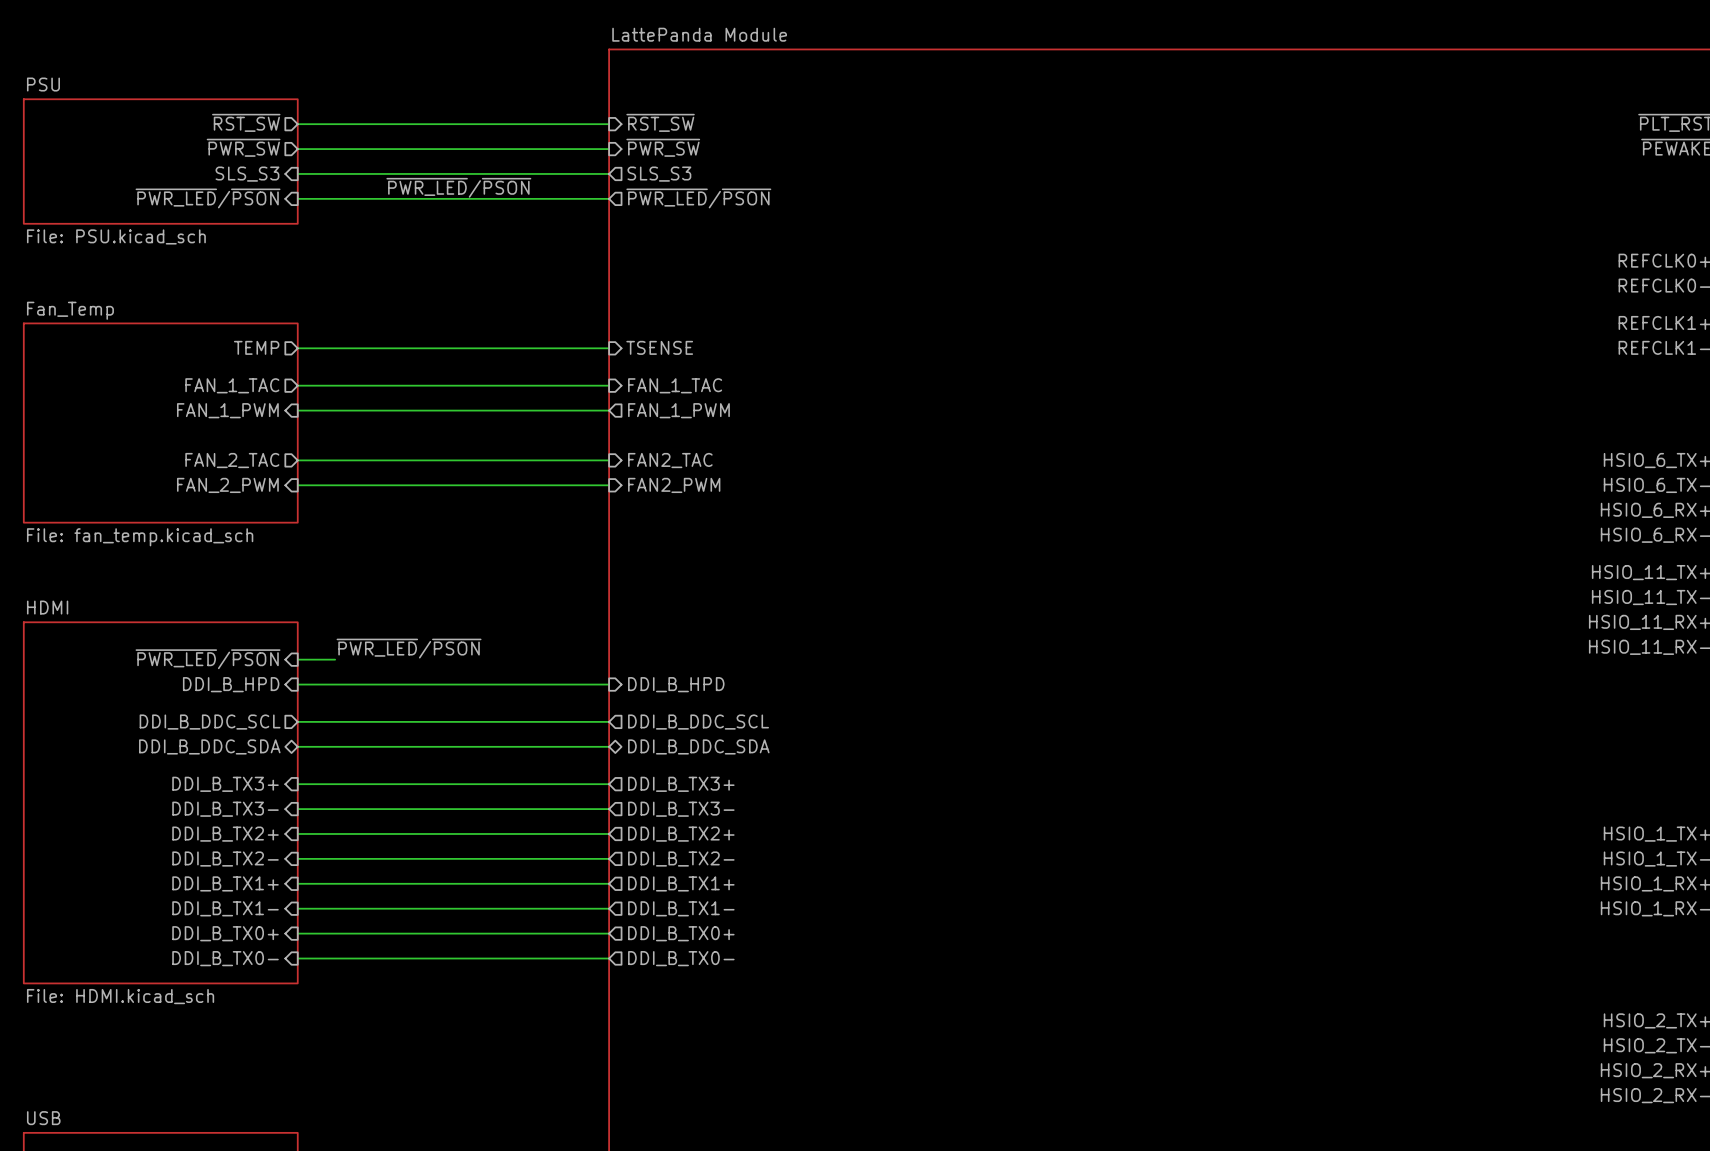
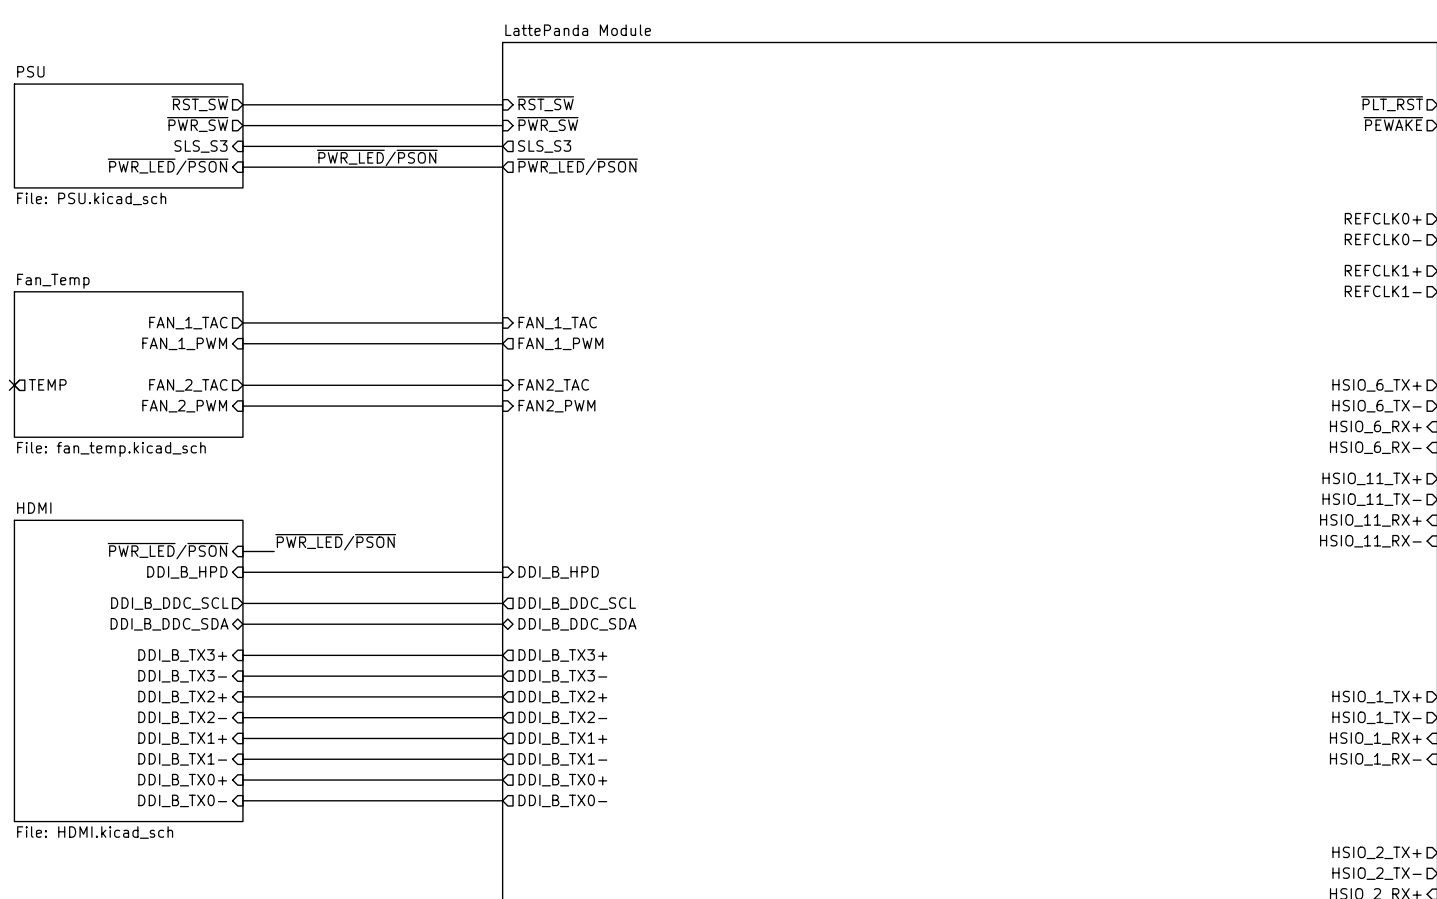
sheet pin: TEMP (256, 347) -> none
sheet pin: TSENSE (659, 347) -> none
wire: (297, 348) (609, 348) -> none
sheet Fan_Temp: File: fan_temp.kicad_sch (160, 423) -> none
sheet Fan_Temp: none -> File: fan_temp.kicad_sch (128, 364)
sheet pin: none -> TEMP (47, 384)
no-connect mark: none -> (14, 385)

